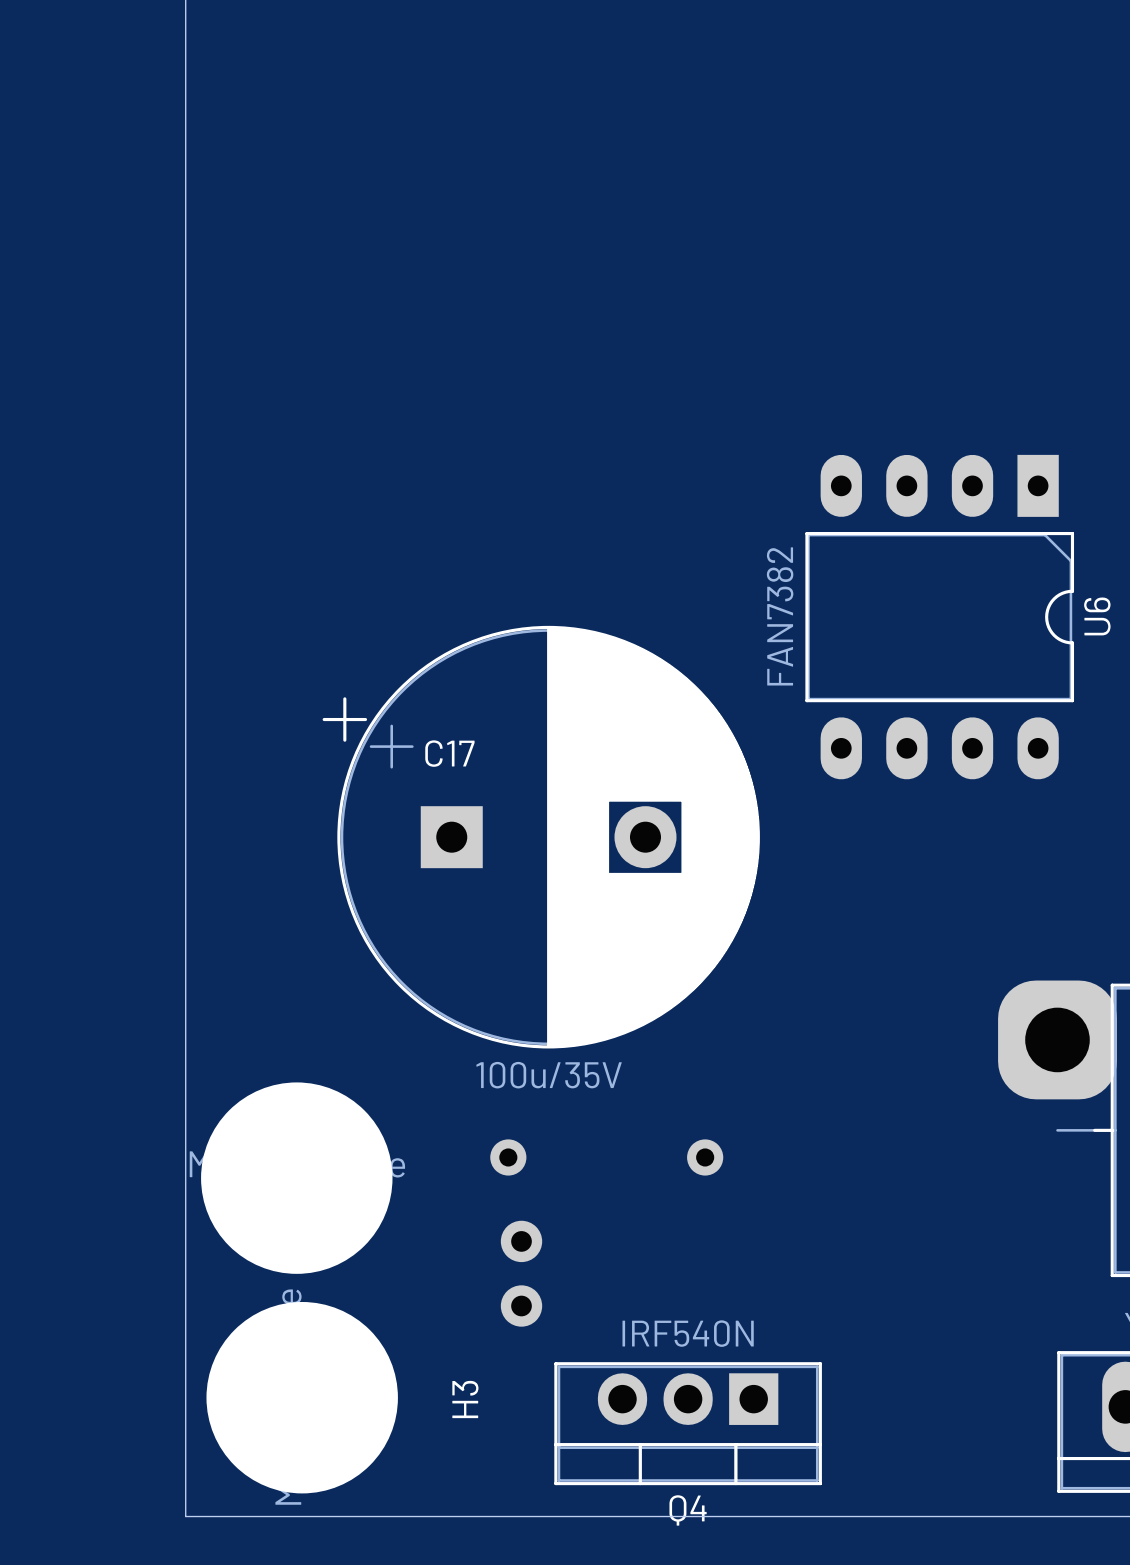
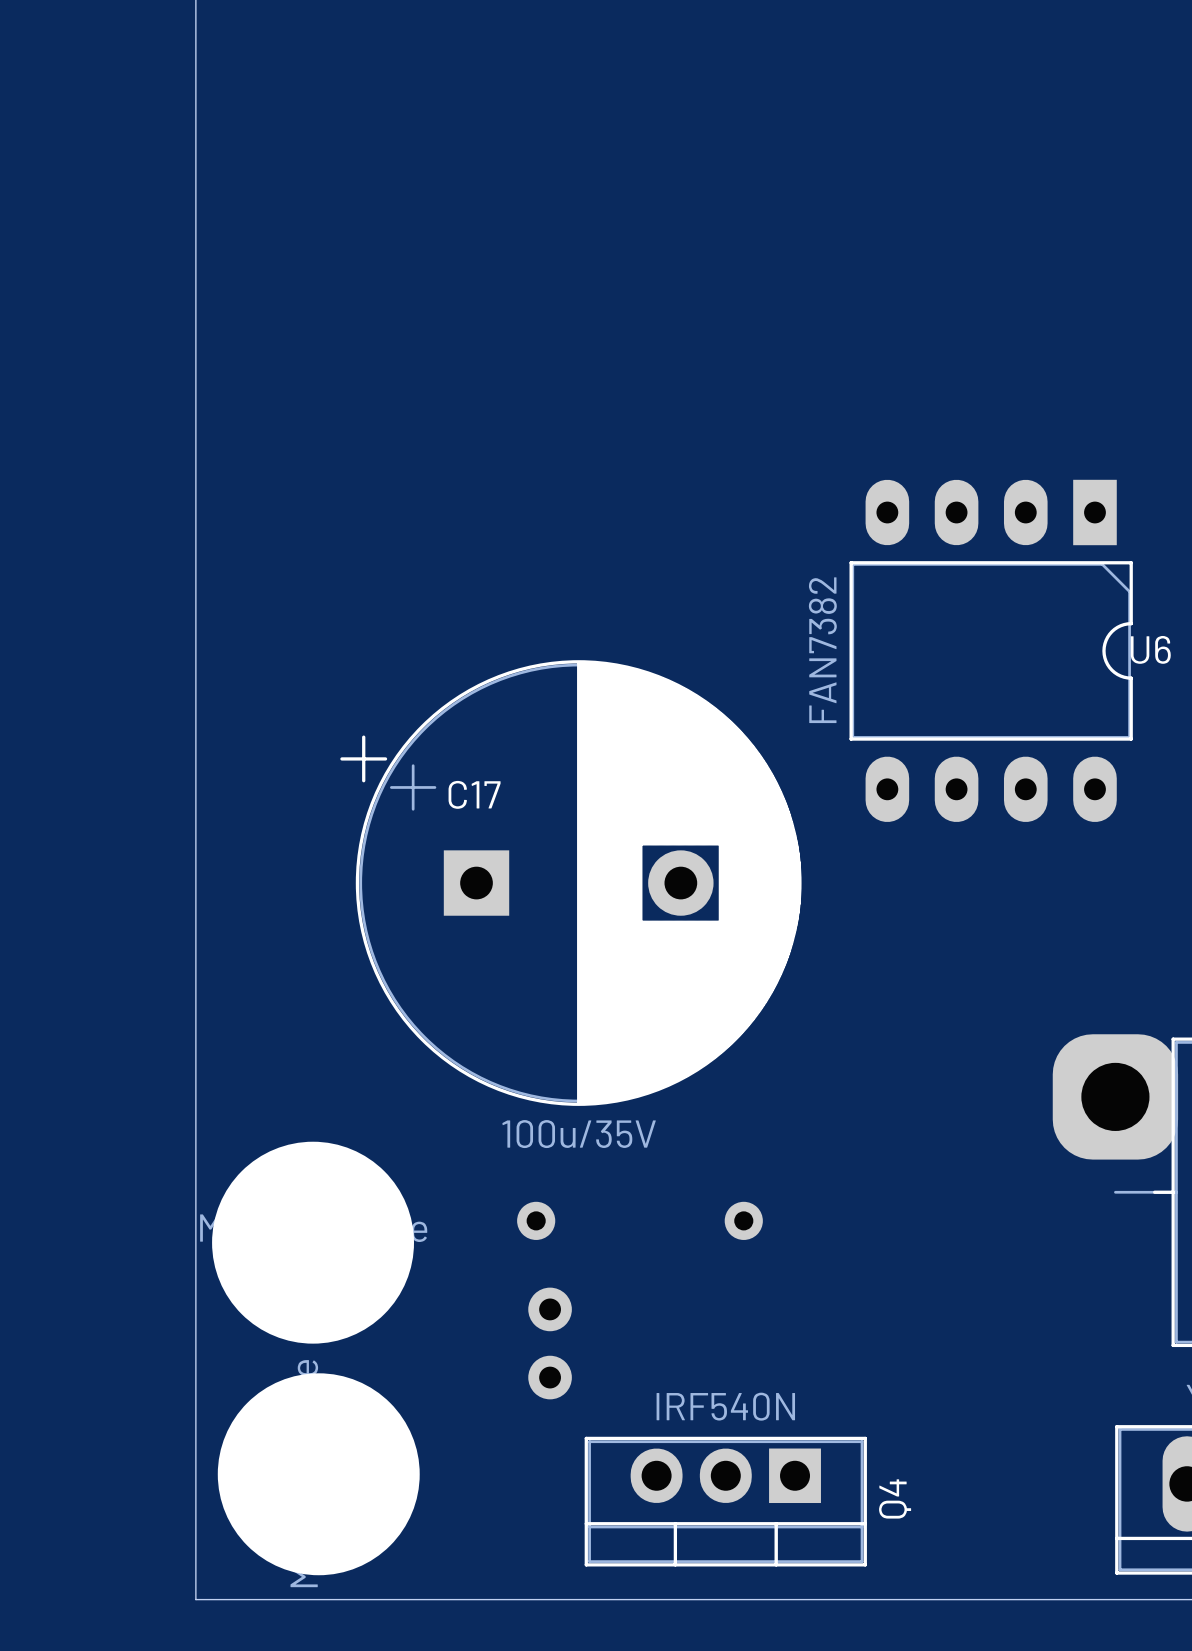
U6 name rotation: 0° (1097, 616) -> 90° clockwise (1150, 649)
H3 name: H3 (465, 1399) -> none
Q4 name rotation: 0° (688, 1510) -> 90° counterclockwise (895, 1498)
Q4 name position: Q4 (688, 1510) -> Q4 (895, 1498)

